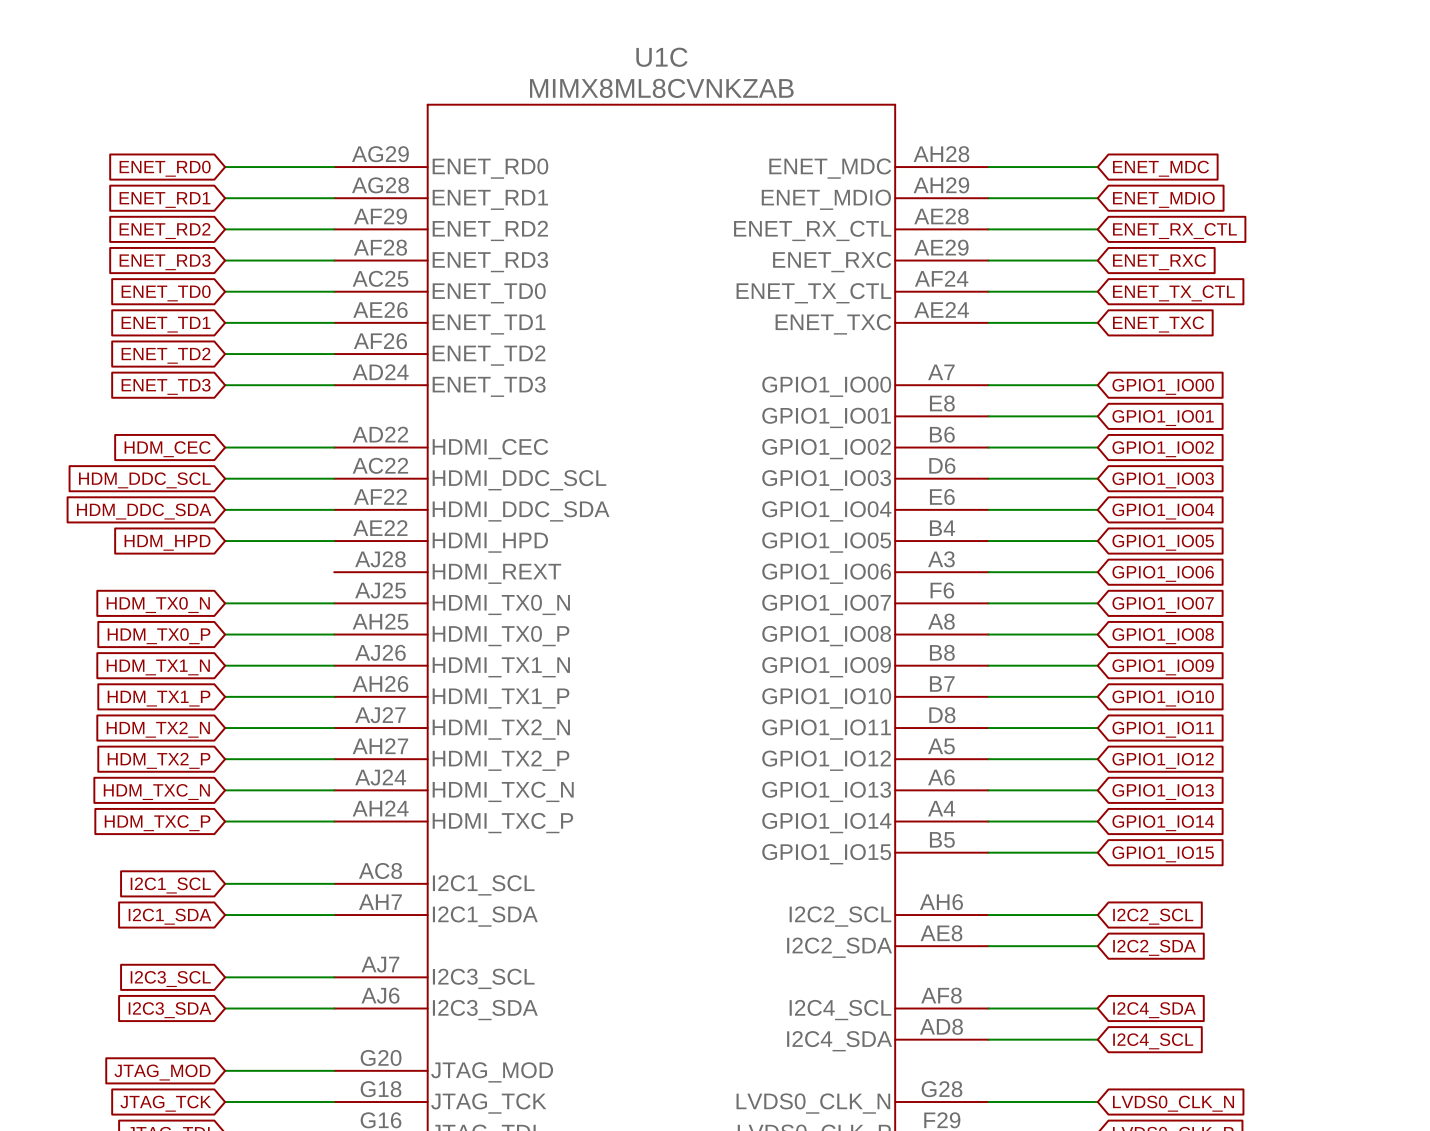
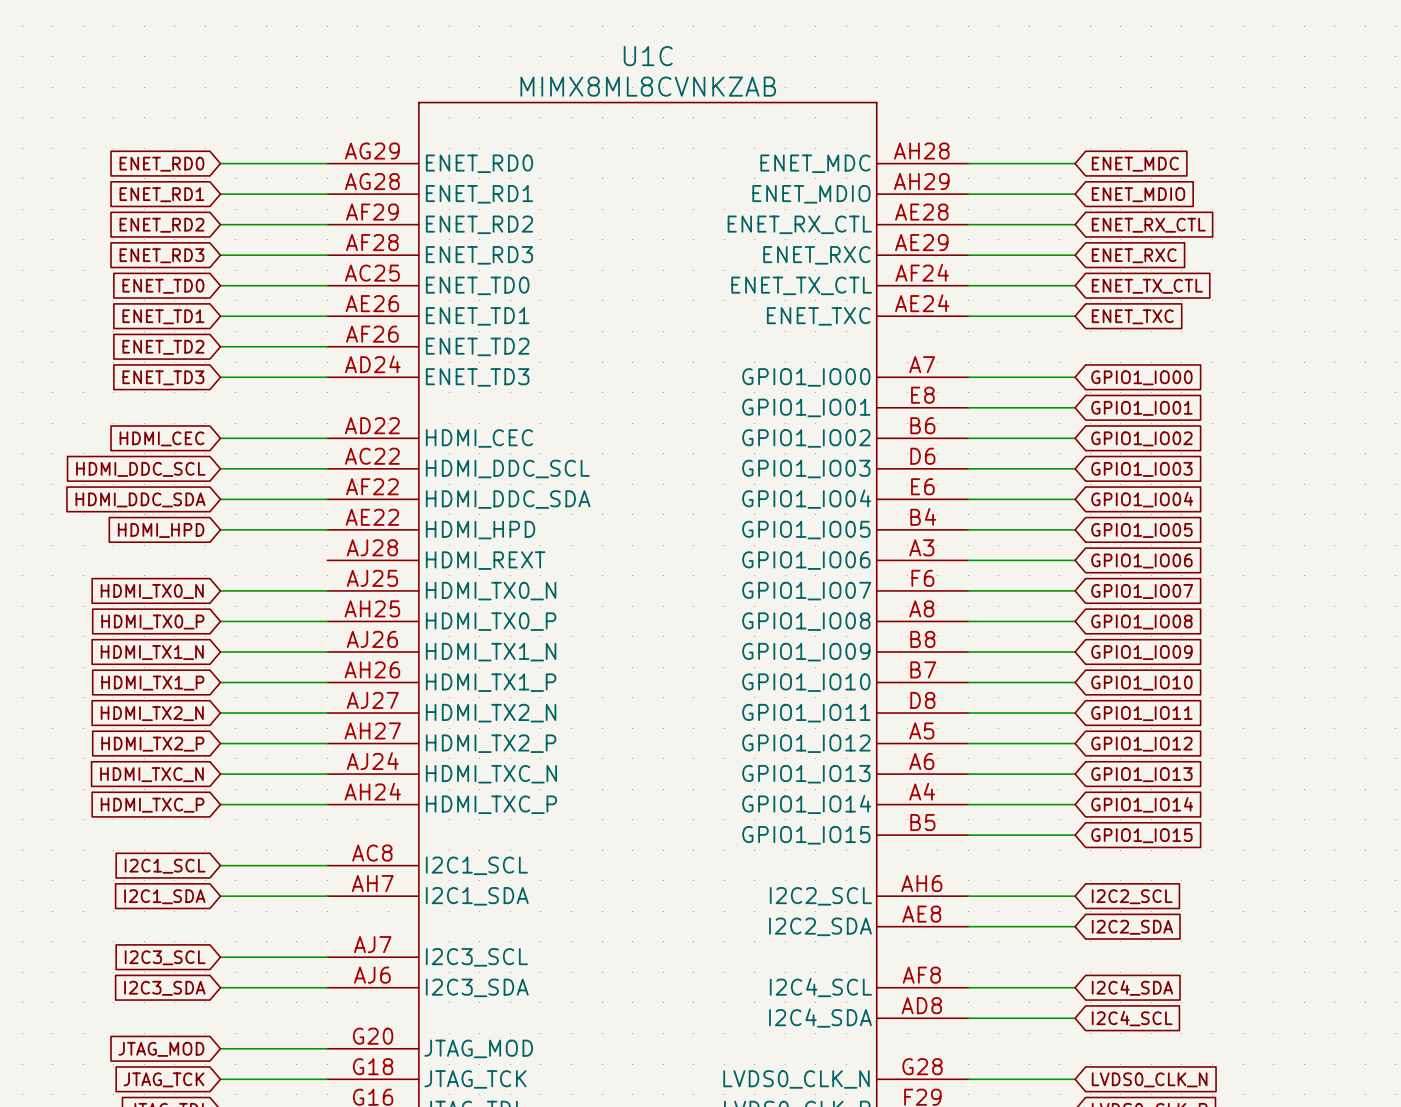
global label: HDM_CEC (167, 449) -> HDMI_CEC (161, 438)
global label: HDM_DDC_SCL (144, 480) -> HDMI_DDC_SCL (140, 469)
global label: HDM_DDC_SDA (144, 511) -> HDMI_DDC_SDA (140, 499)
global label: HDM_HPD (167, 542) -> HDMI_HPD (161, 530)
global label: HDM_TX0_N (158, 605) -> HDMI_TX0_N (152, 591)
global label: HDM_TX0_P (159, 636) -> HDMI_TX0_P (152, 622)
global label: HDM_TX1_N (158, 667) -> HDMI_TX1_N (152, 652)
global label: HDM_TX1_P (159, 698) -> HDMI_TX1_P (152, 683)
global label: HDM_TX2_N (158, 729) -> HDMI_TX2_N (152, 713)
global label: HDM_TX2_P (159, 760) -> HDMI_TX2_P (152, 744)
global label: HDM_TXC_N (156, 792) -> HDMI_TXC_N (151, 774)
global label: HDM_TXC_P (157, 823) -> HDMI_TXC_P (152, 805)

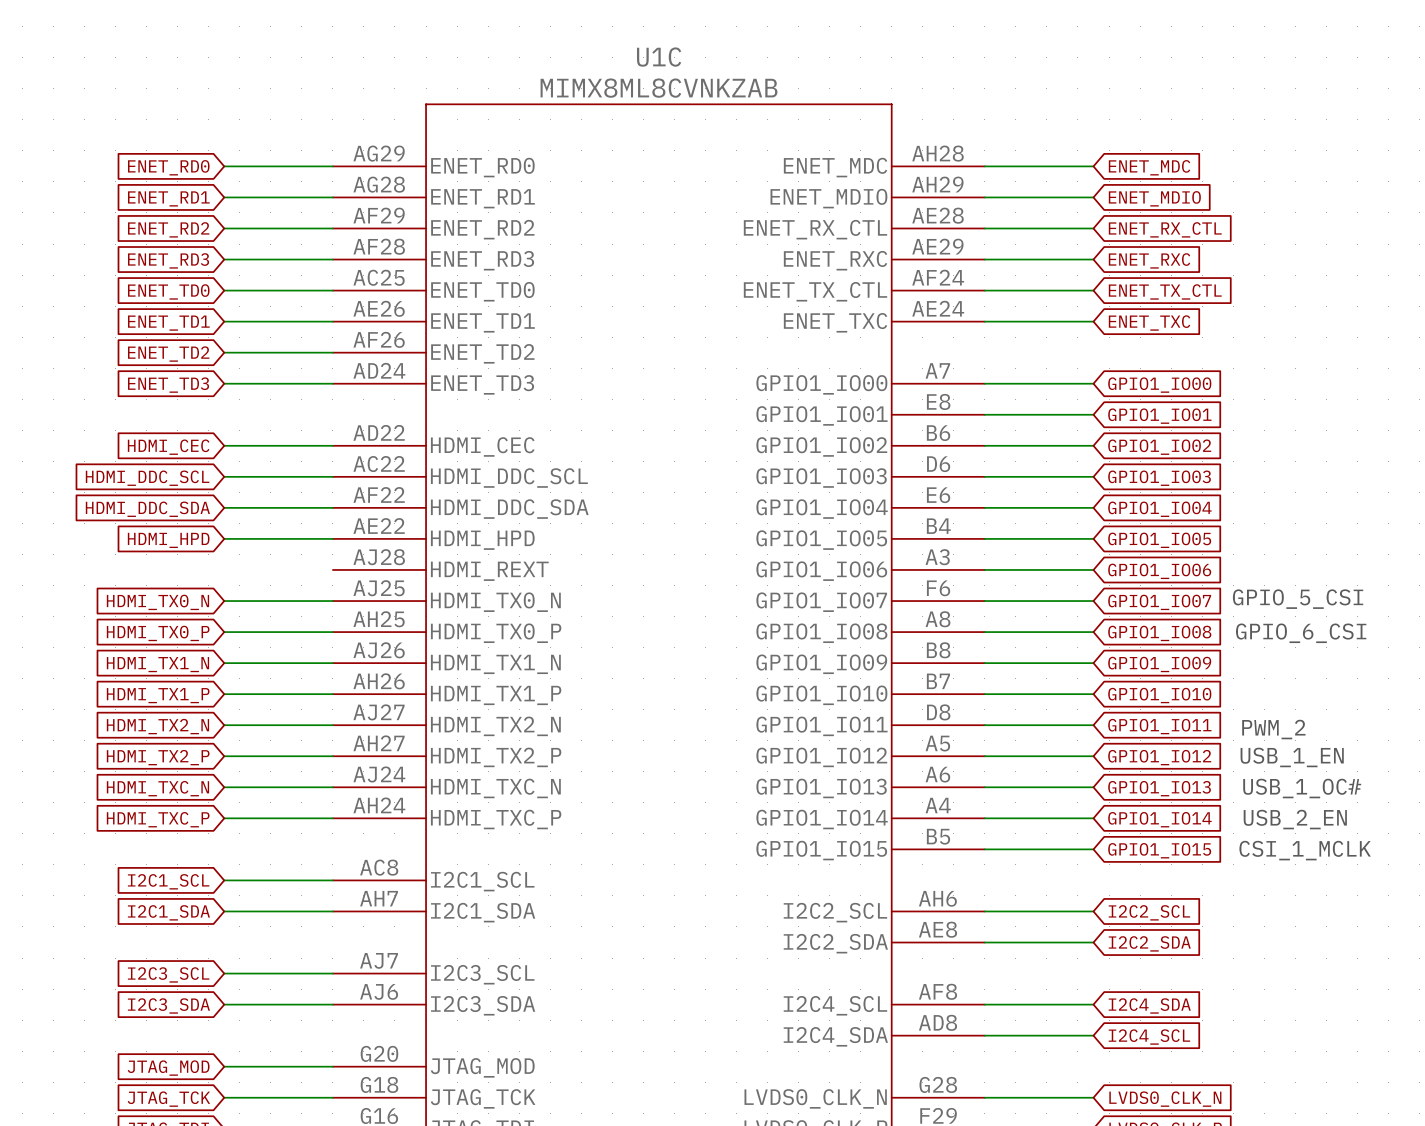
text: none -> GPIO_5_CSI (1298, 599)
text: none -> GPIO_6_CSI (1301, 633)
text: none -> PWM_2 (1273, 729)
text: none -> USB_1_EN (1292, 757)
text: none -> USB_1_OC# (1302, 788)
text: none -> USB_2_EN (1295, 819)
text: none -> CSI_1_MCLK (1305, 850)

